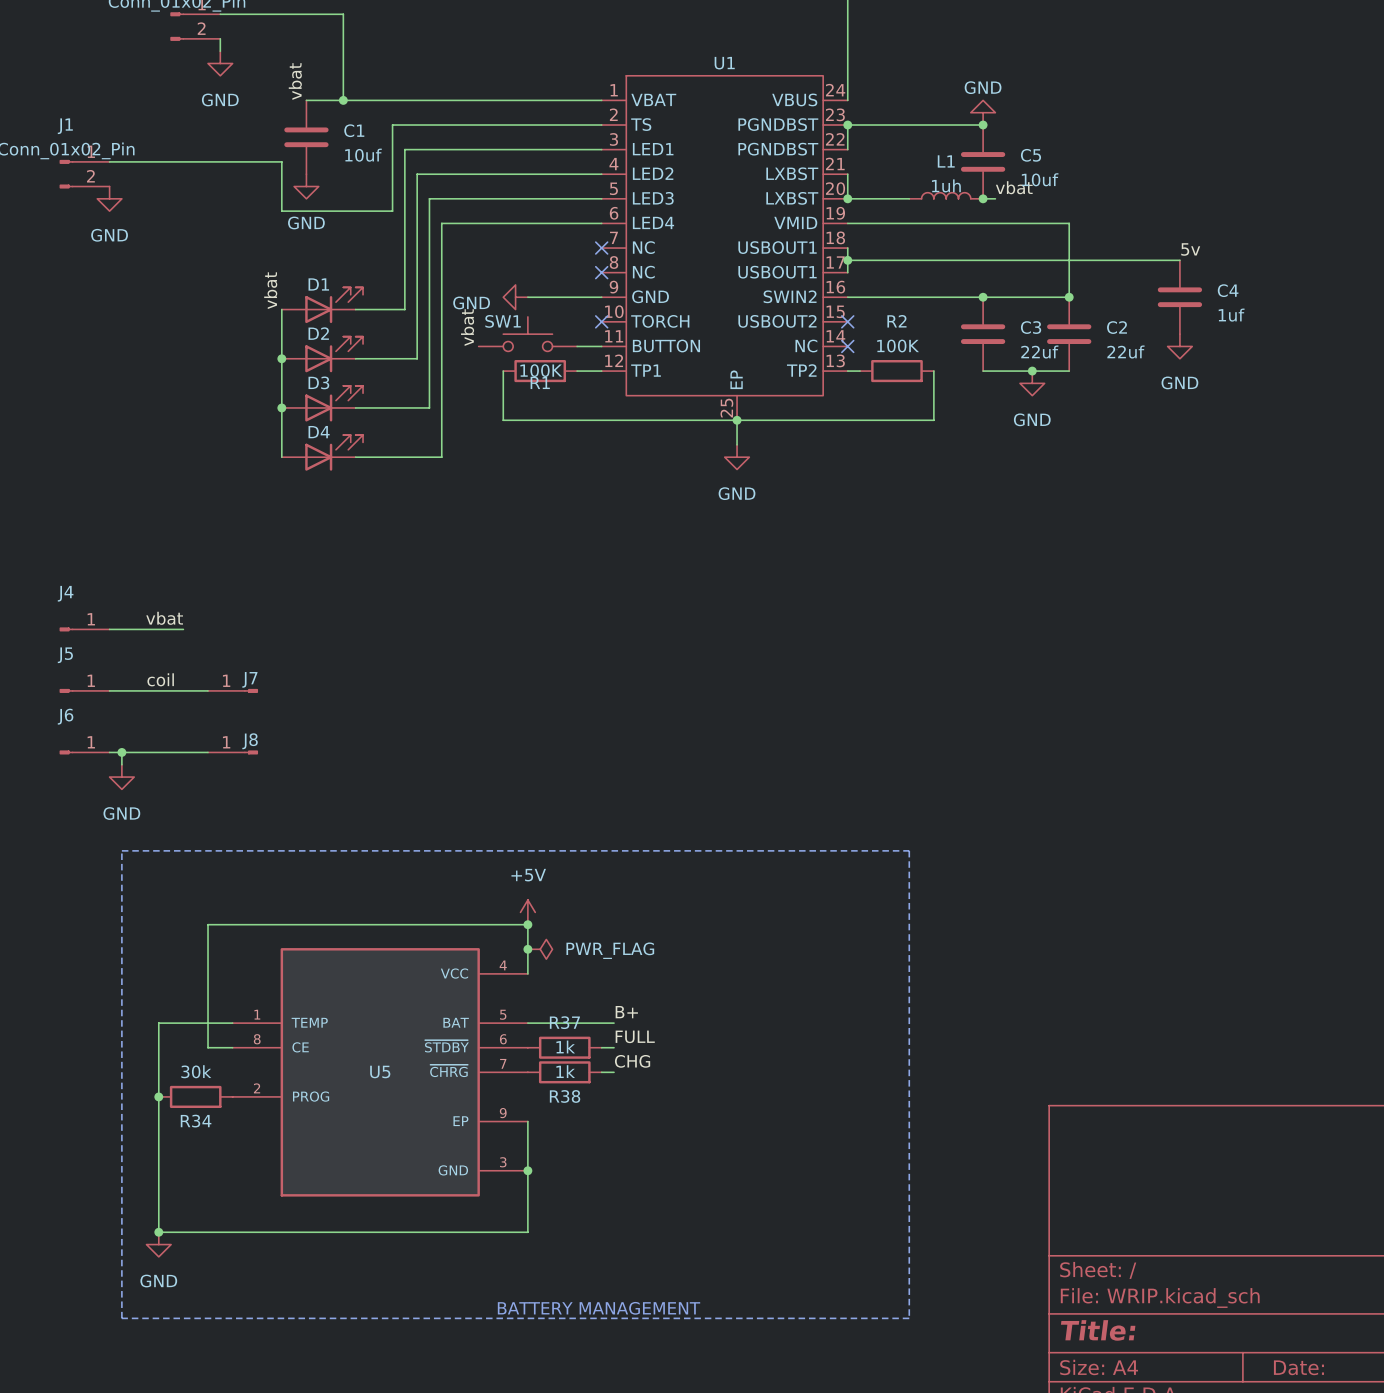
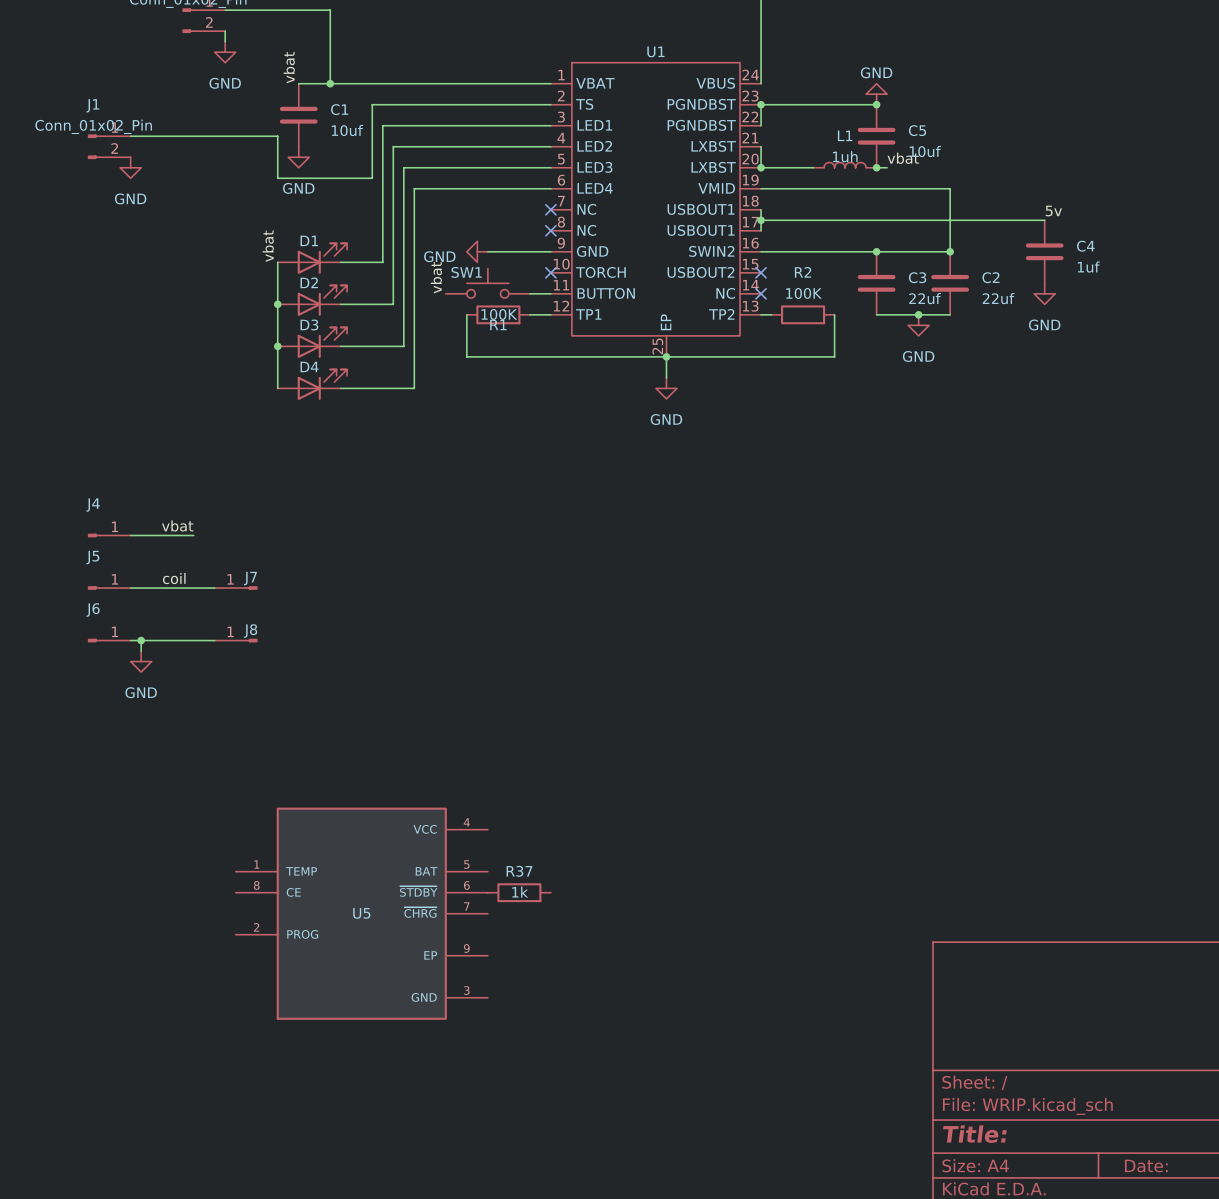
line: (121, 850) (909, 850) (909, 1318) (121, 1318) (121, 850) -> none
power symbol: +5V (527, 912) -> none
junction: (527, 924) -> none
junction: (527, 949) -> none
power symbol: PWR_FLAG (540, 949) -> none
wire: (527, 973) (527, 924) (208, 924) (208, 1047) (232, 1047) -> none
label: B+ (626, 1012) -> none
wire: (232, 1023) (158, 1023) (158, 1232) (527, 1232) (527, 1121) -> none
wire: (527, 1023) (614, 1023) -> none
label: FULL (635, 1036) -> none
wire: (601, 1047) (614, 1047) -> none
label: CHG (632, 1061) -> none
R38: 1k (564, 1072) -> none
wire: (601, 1072) (614, 1072) -> none
junction: (158, 1096) -> none
R34: 30k (195, 1096) -> none
junction: (527, 1170) -> none
junction: (158, 1232) -> none
power symbol: GND (158, 1244) -> none
text: BATTERY MANAGEMENT (599, 1308) -> none

